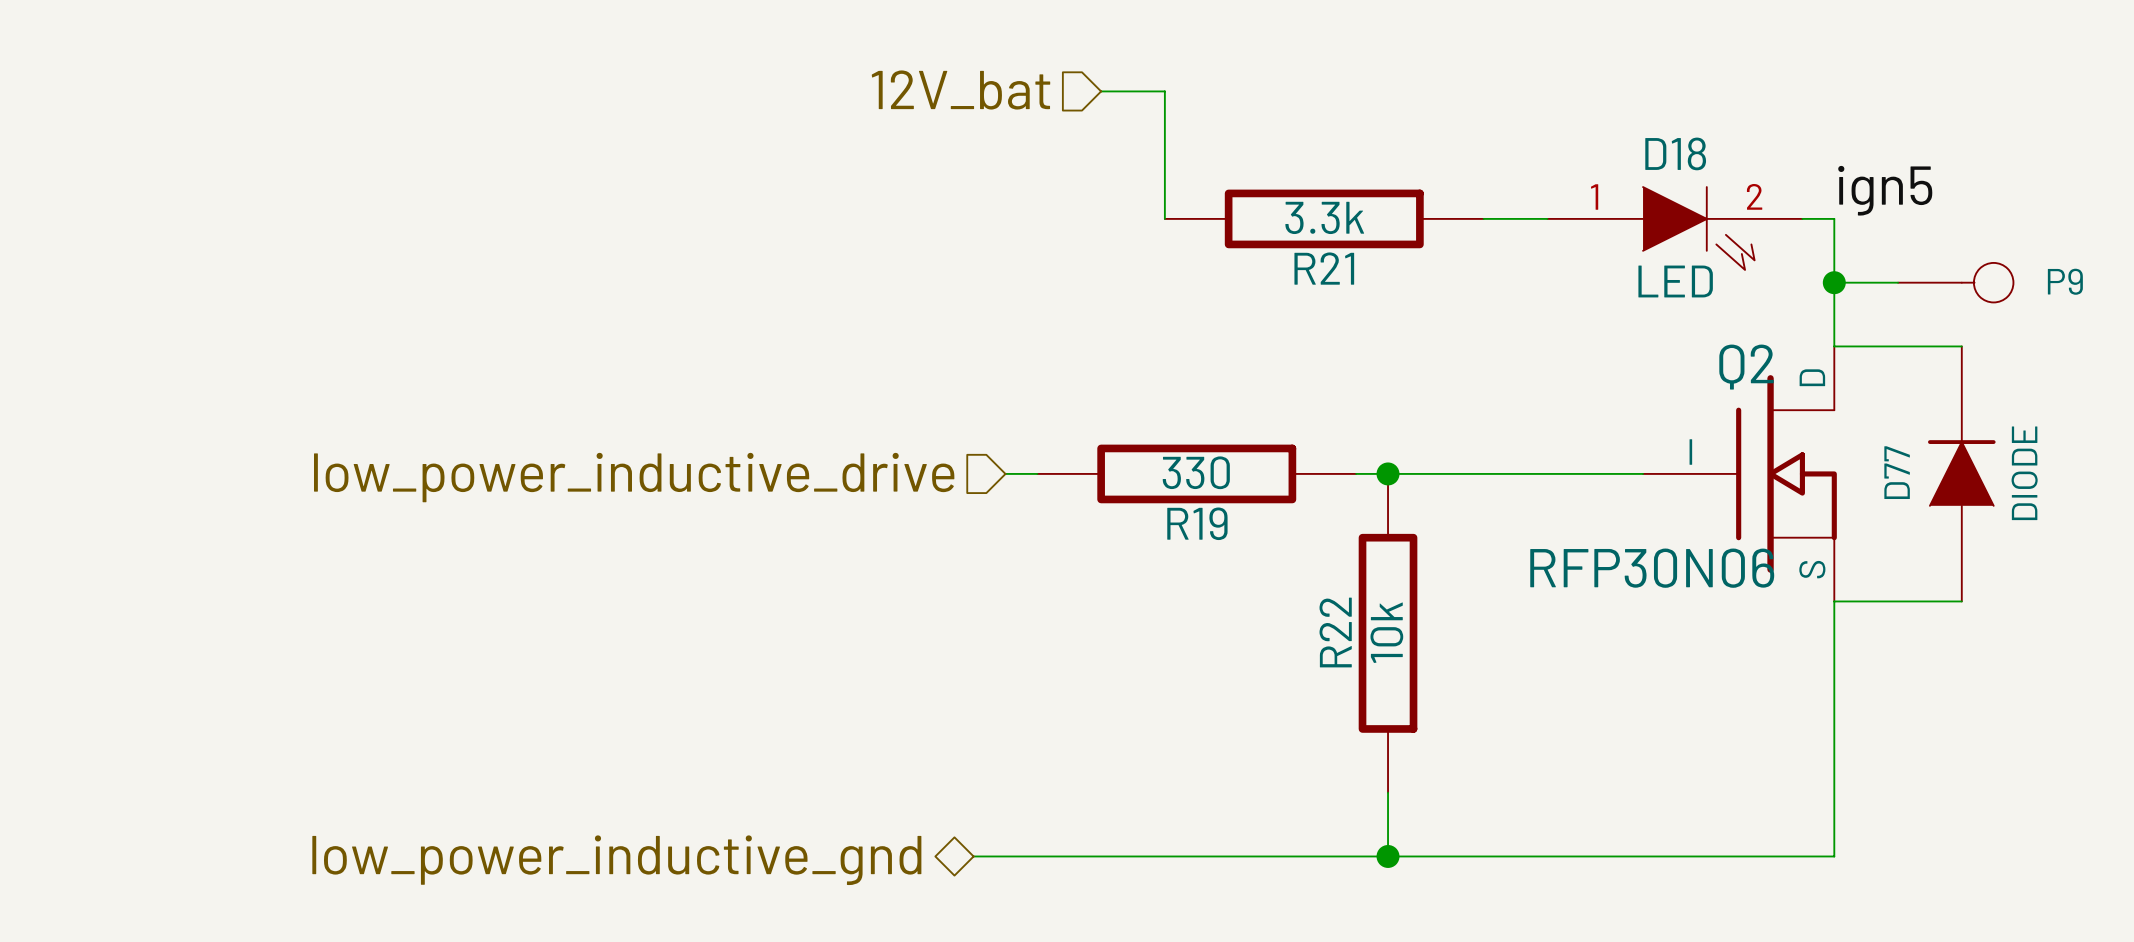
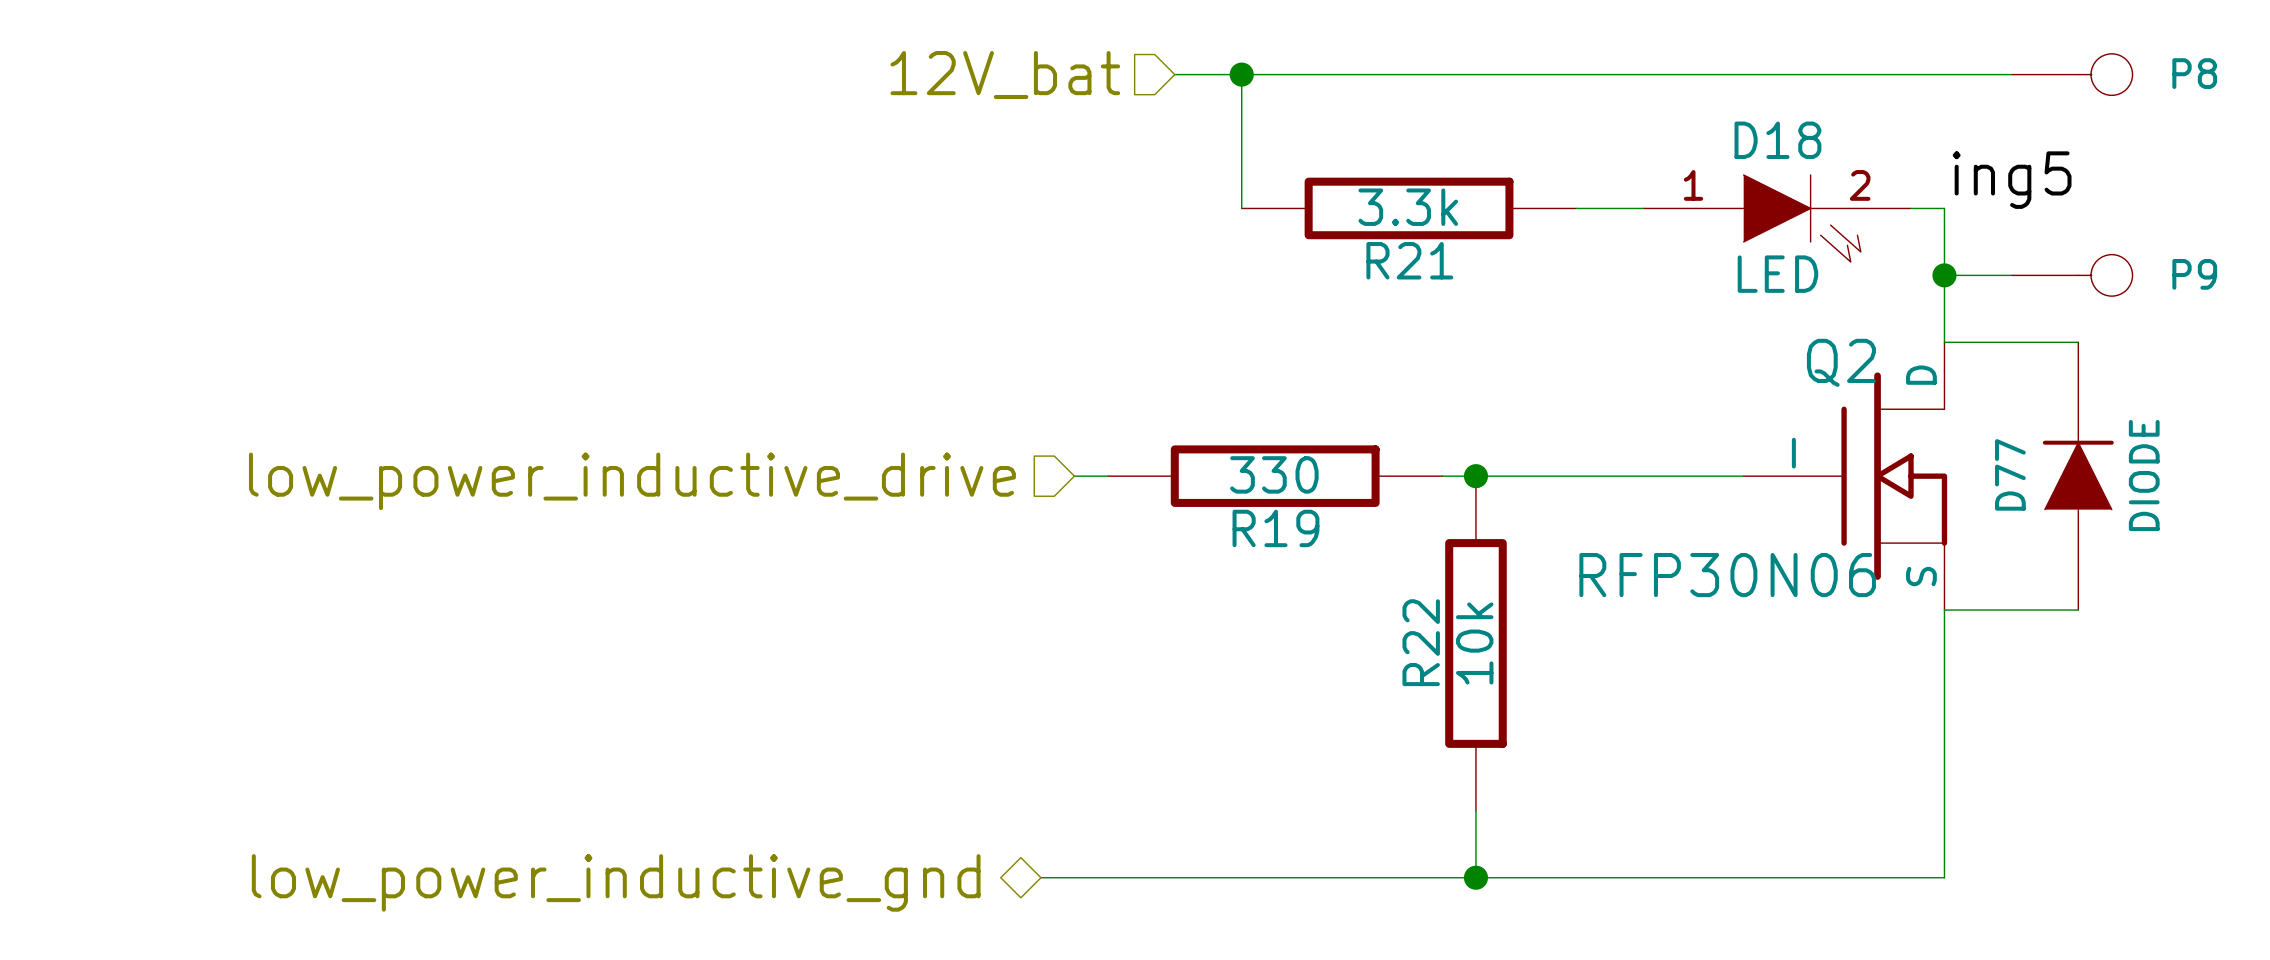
wire: none -> (1241, 74) (2011, 74)
junction: none -> (1241, 74)
P8: none -> (2071, 74)
label: ign5 (1885, 190) -> ing5 (2012, 180)

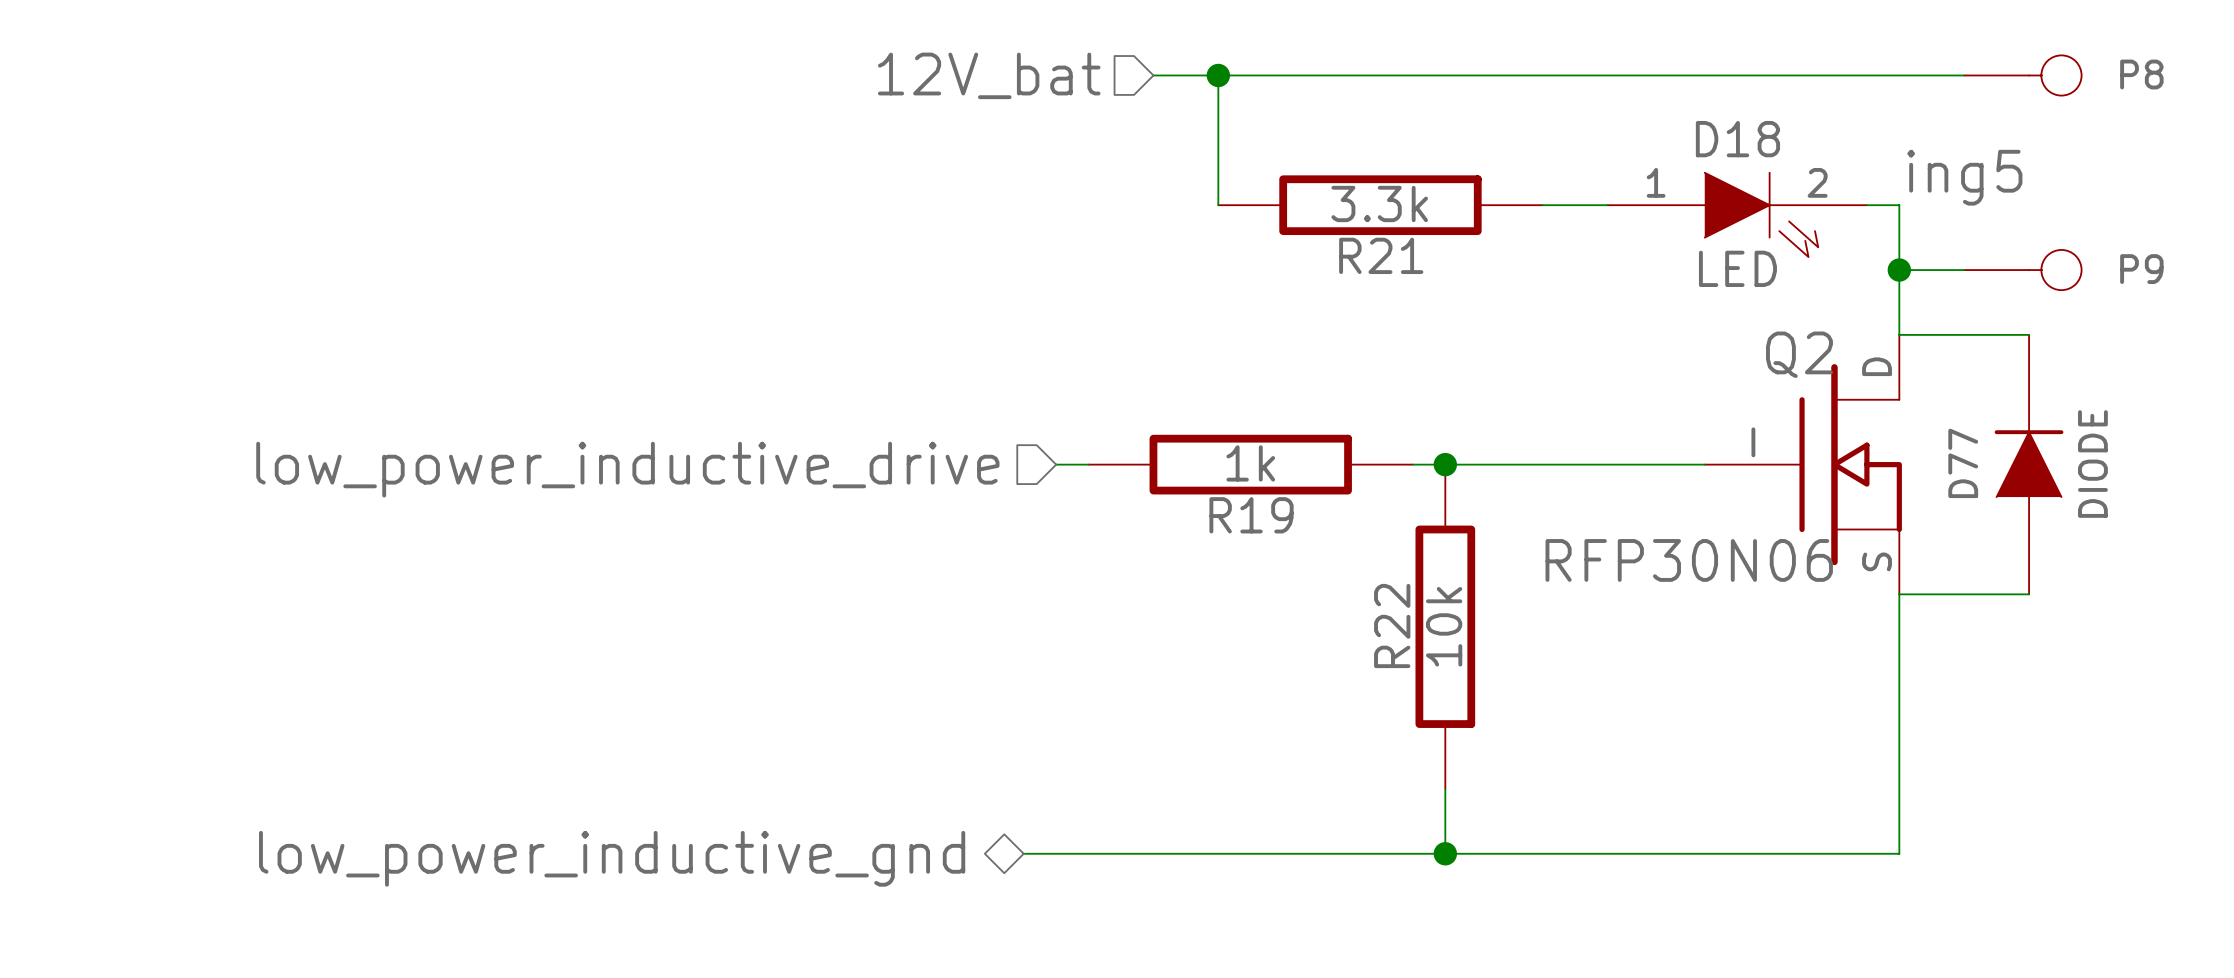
R19 value: 330 (1274, 474) -> 1k (1250, 463)

